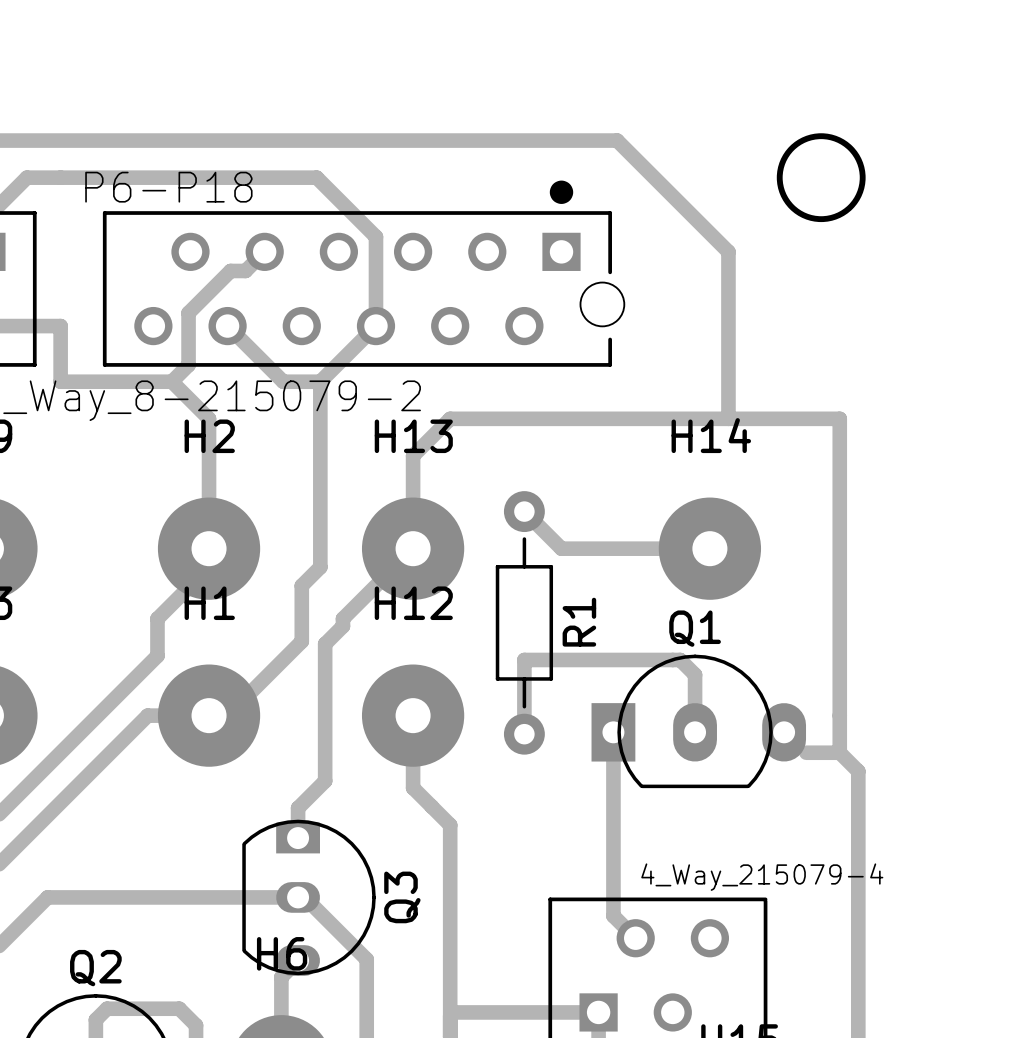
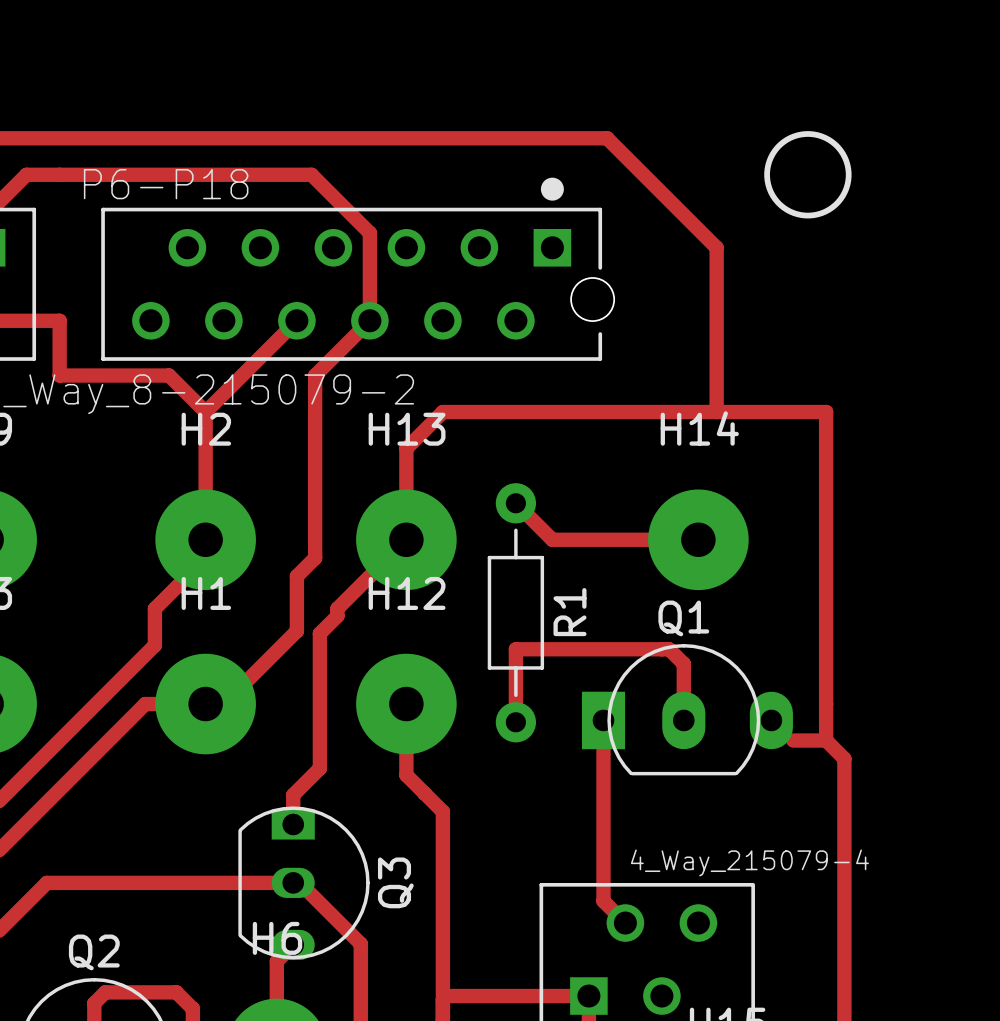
track: (264, 251) (245, 270) (230, 270) (188, 313) (188, 365) (171, 381) -> none
track: (227, 326) (283, 381) (320, 381) -> none
track: none -> (296, 320) (205, 412)

